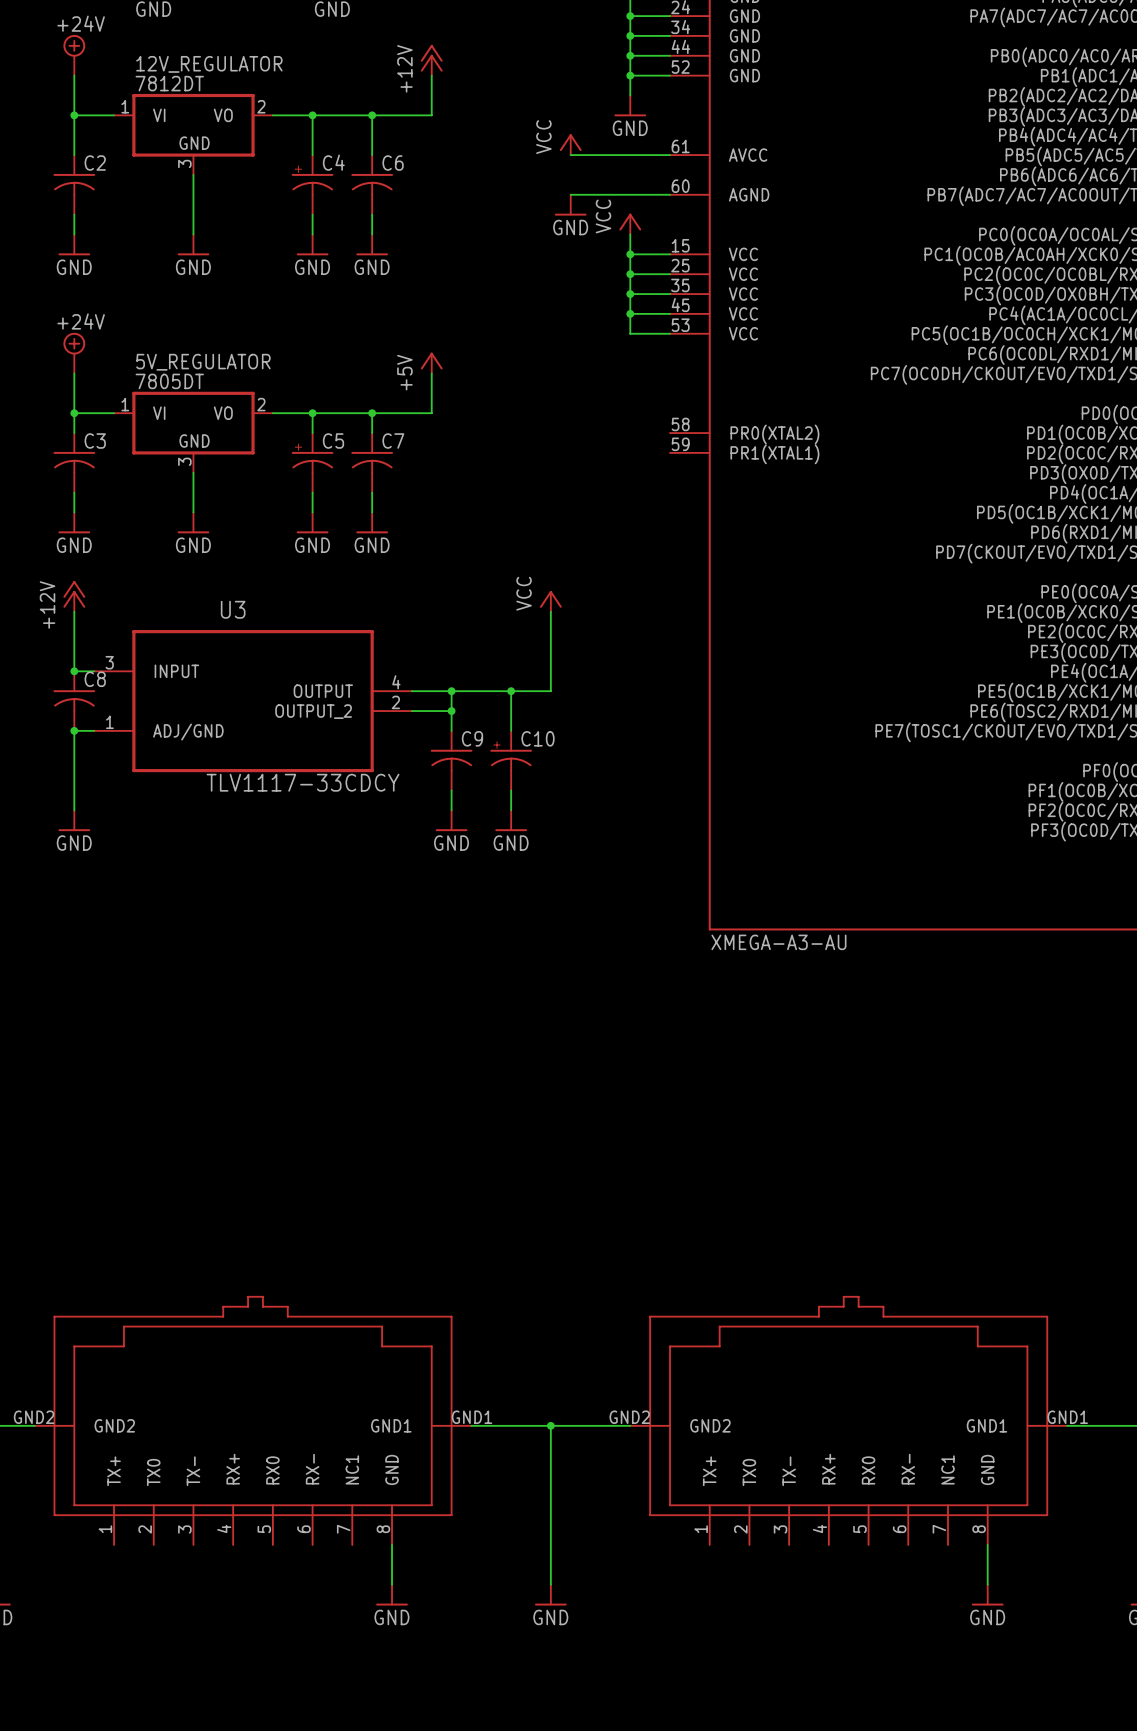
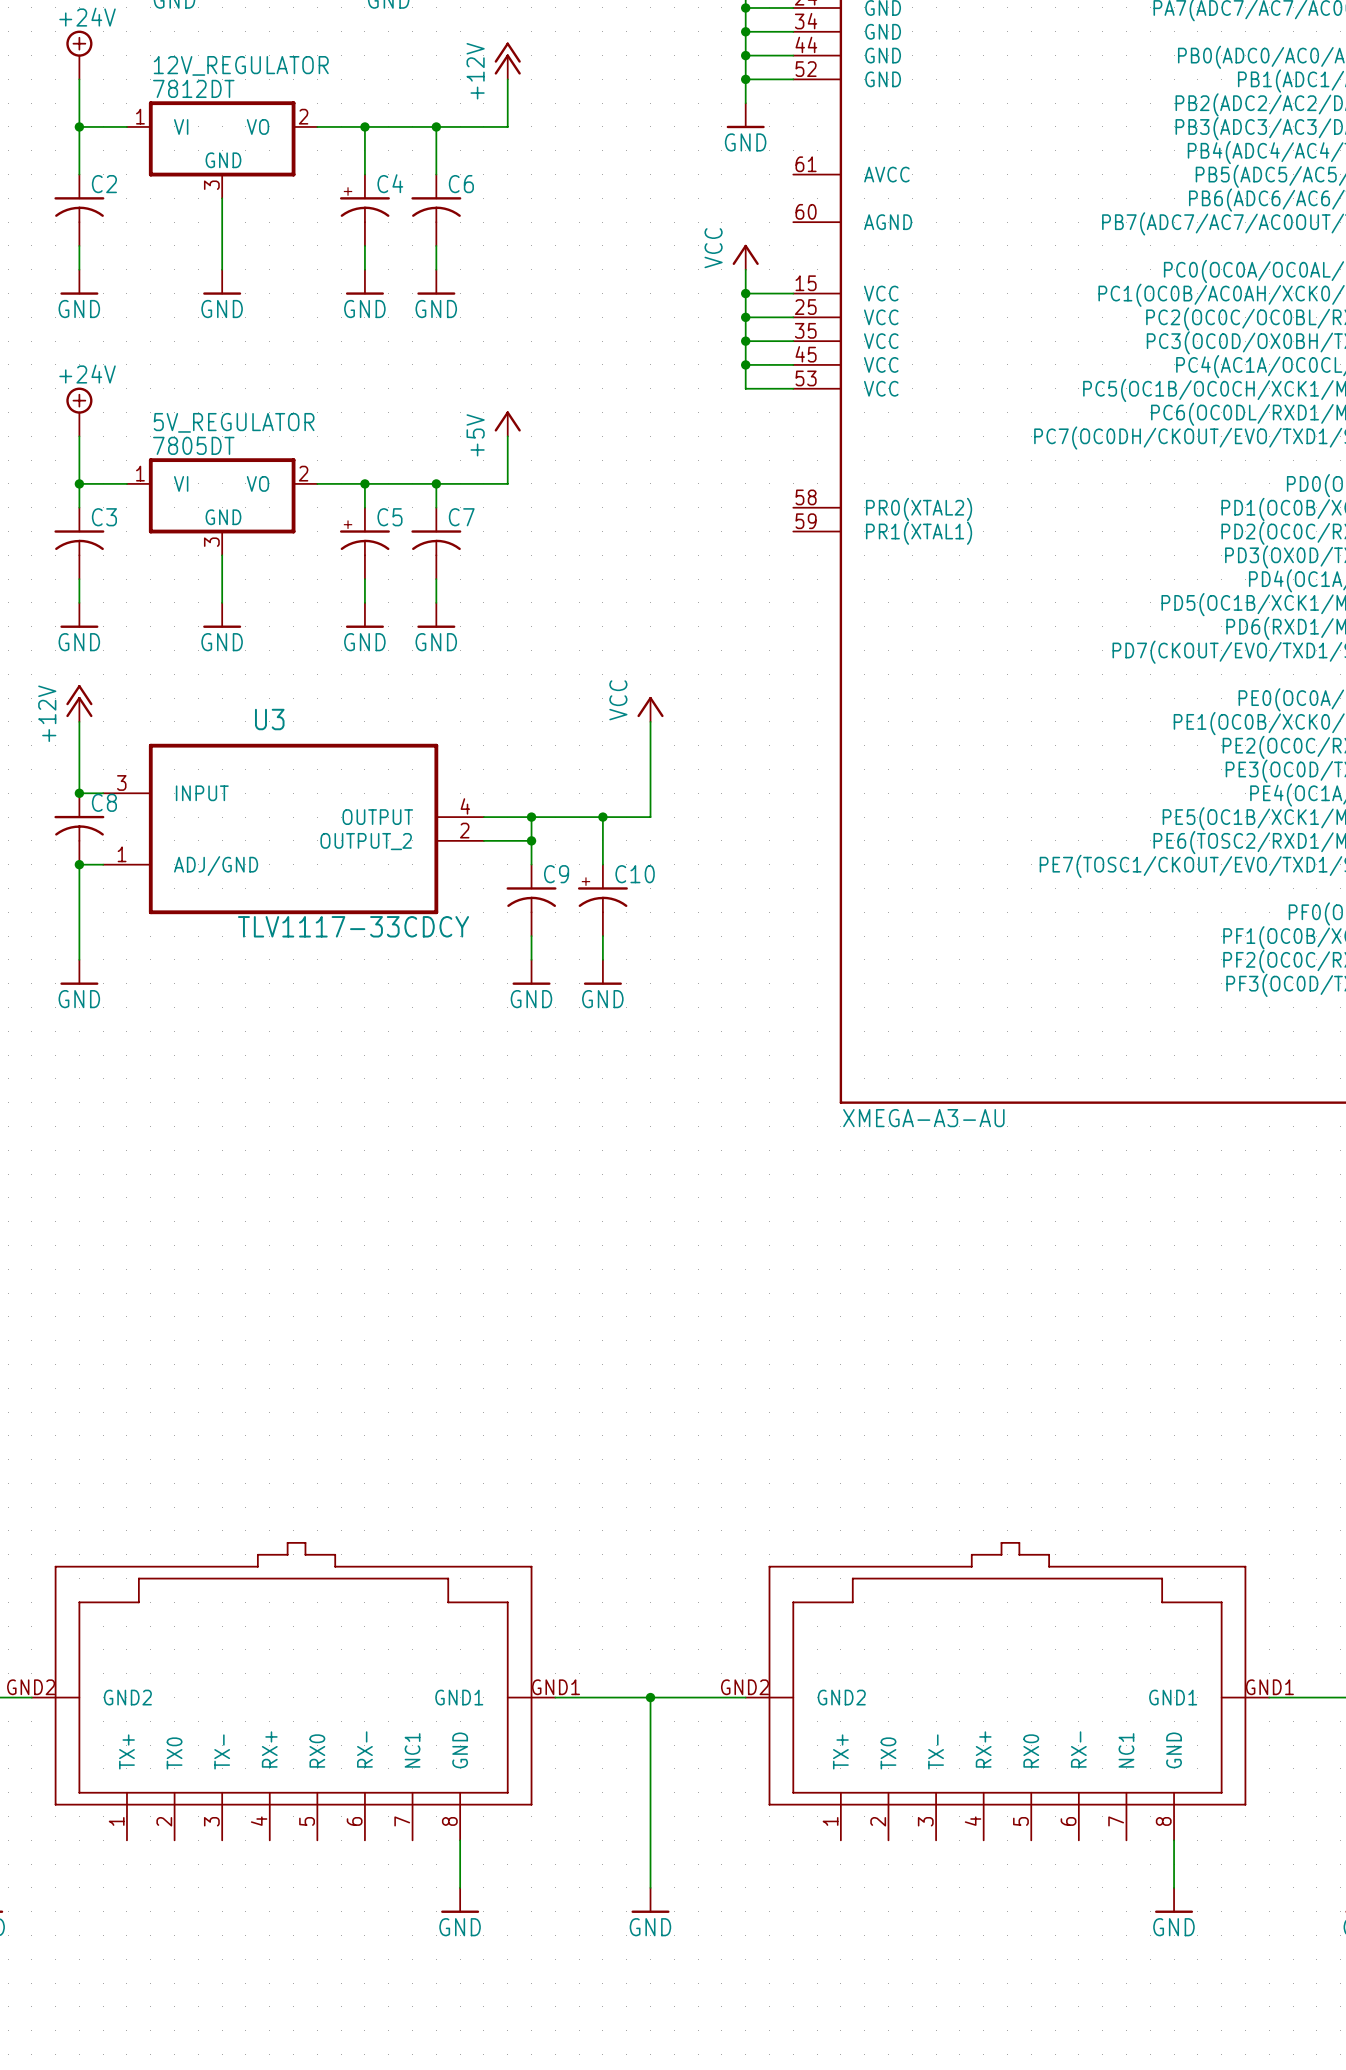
power symbol: VCC (570, 144) -> none
wire: (570, 155) (670, 155) -> none
wire: (570, 194) (670, 194) -> none
power symbol: GND (570, 205) -> none

